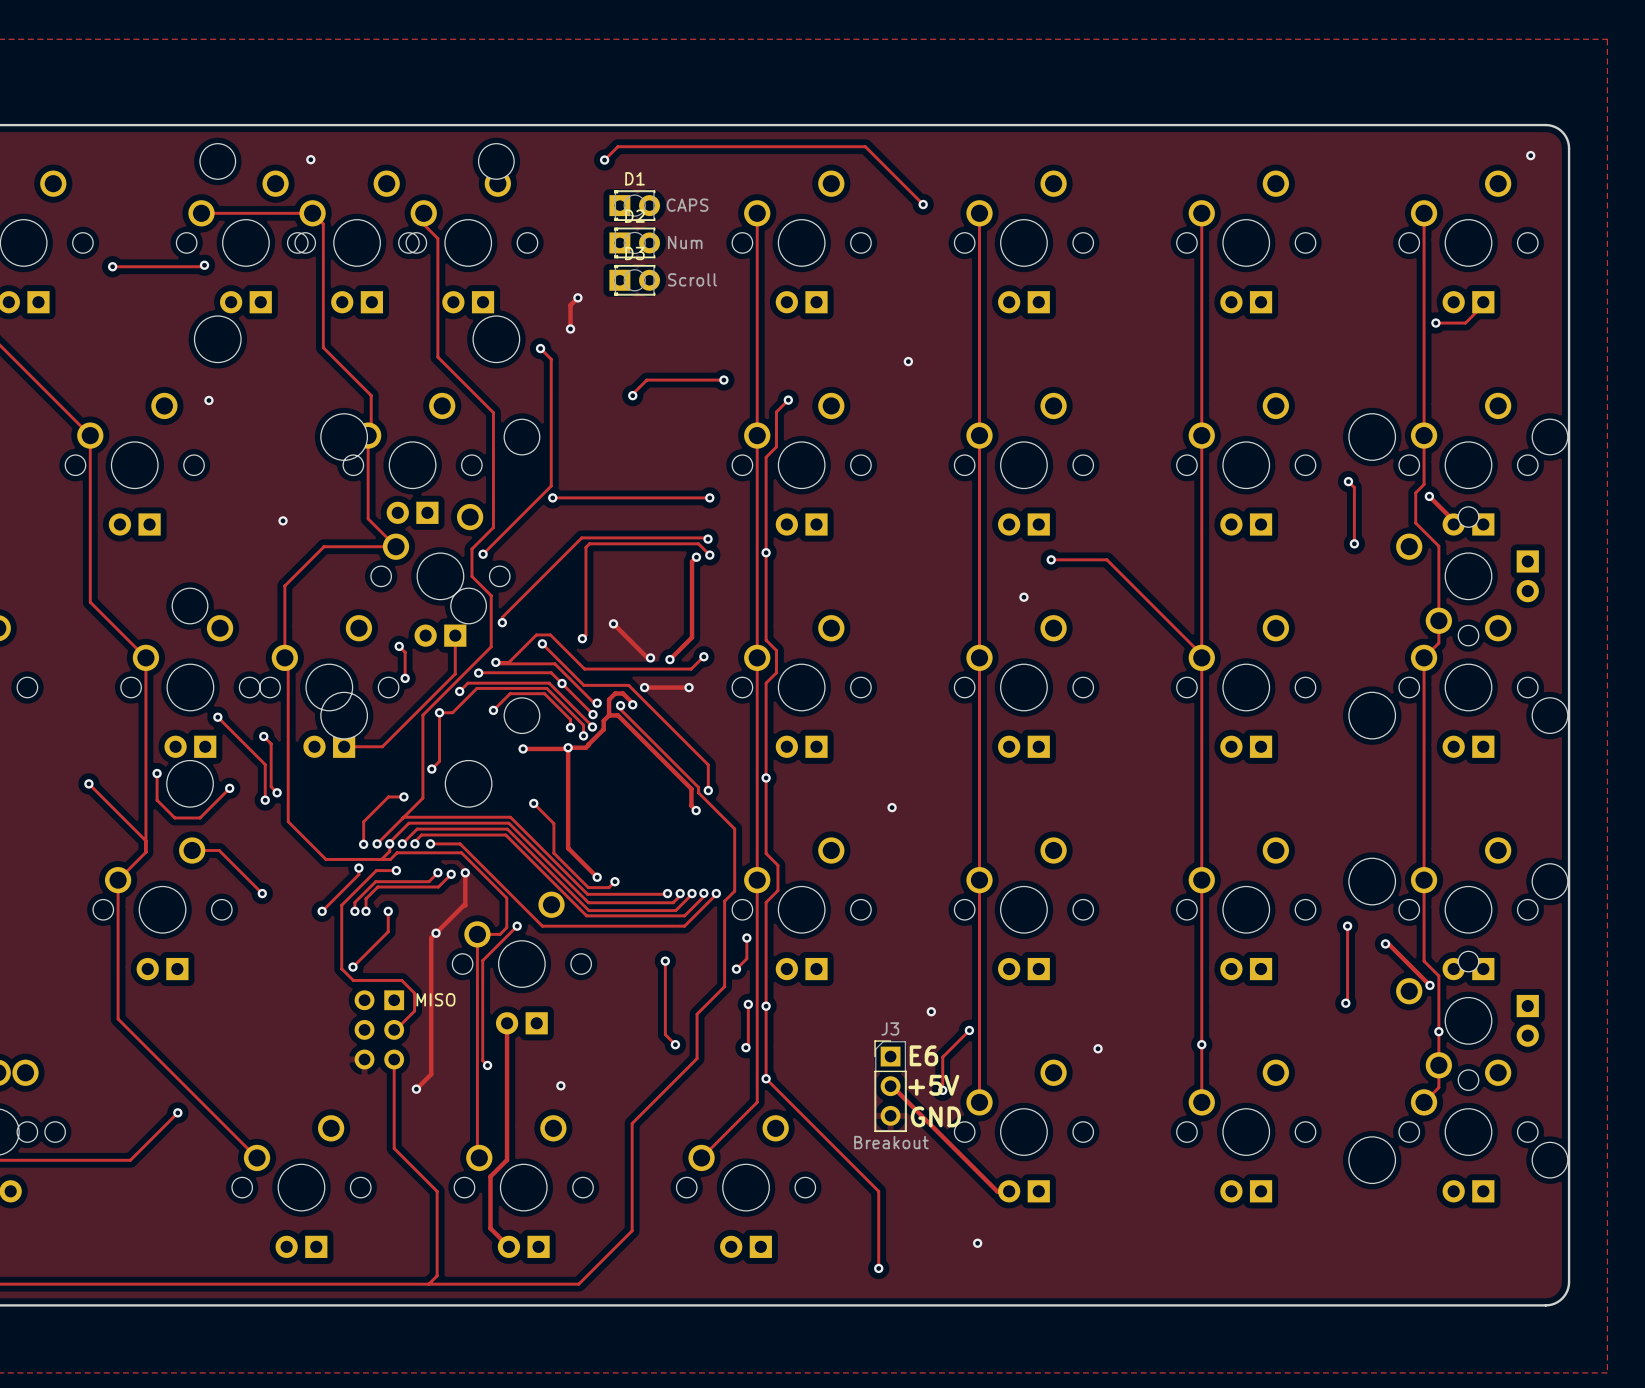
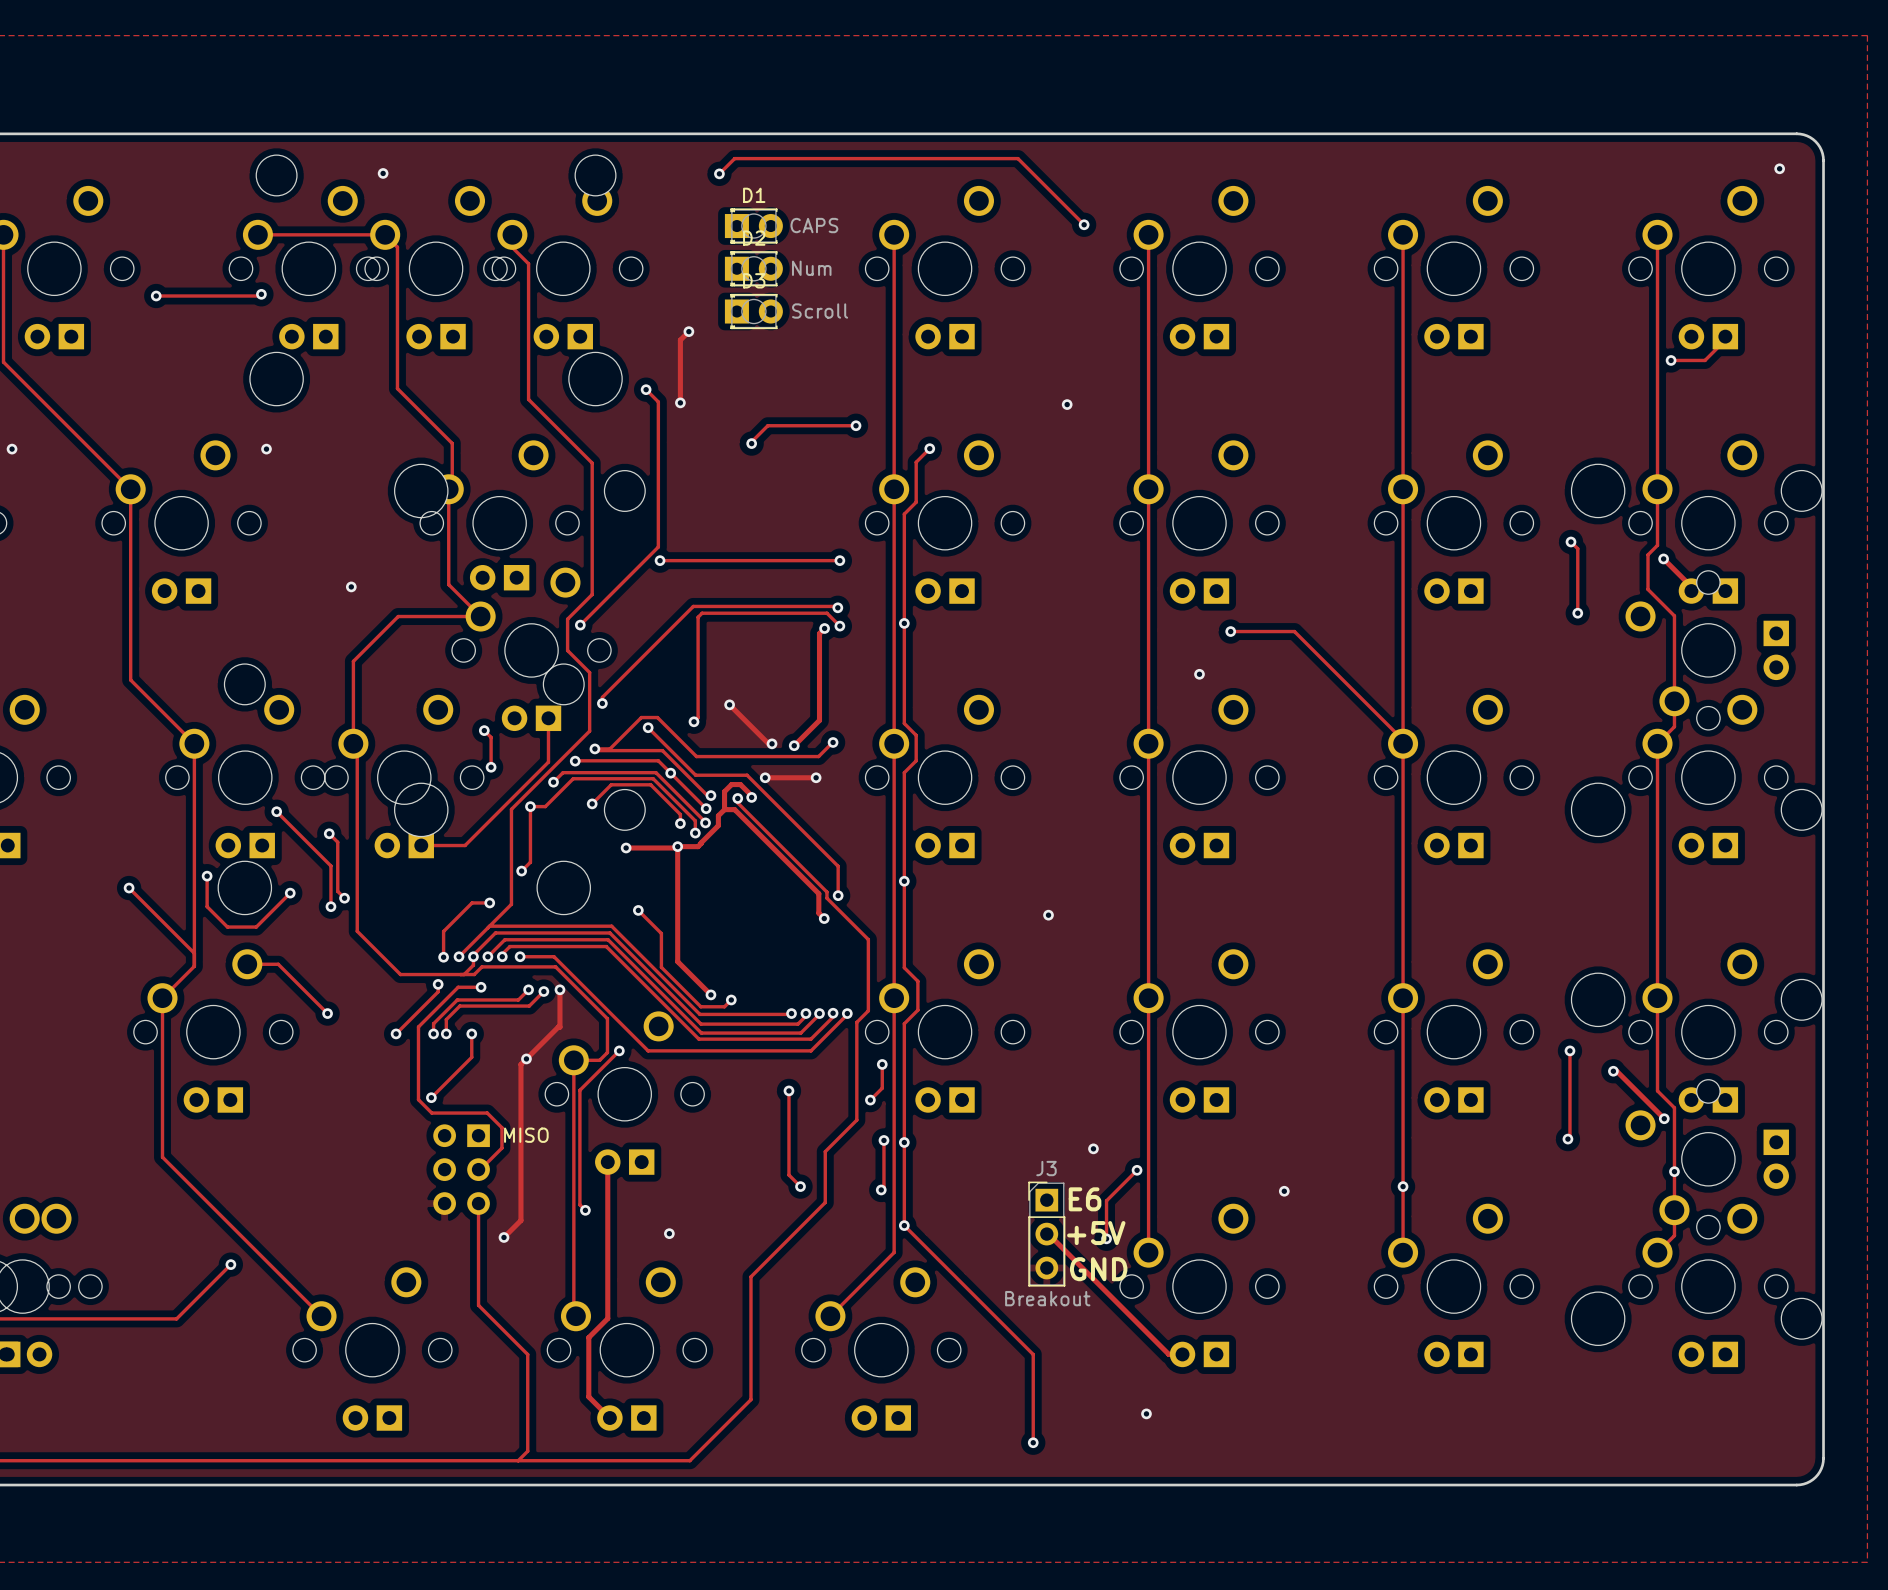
track: none -> (680, 367) (680, 402)
via position: (570, 328) -> (680, 402)

